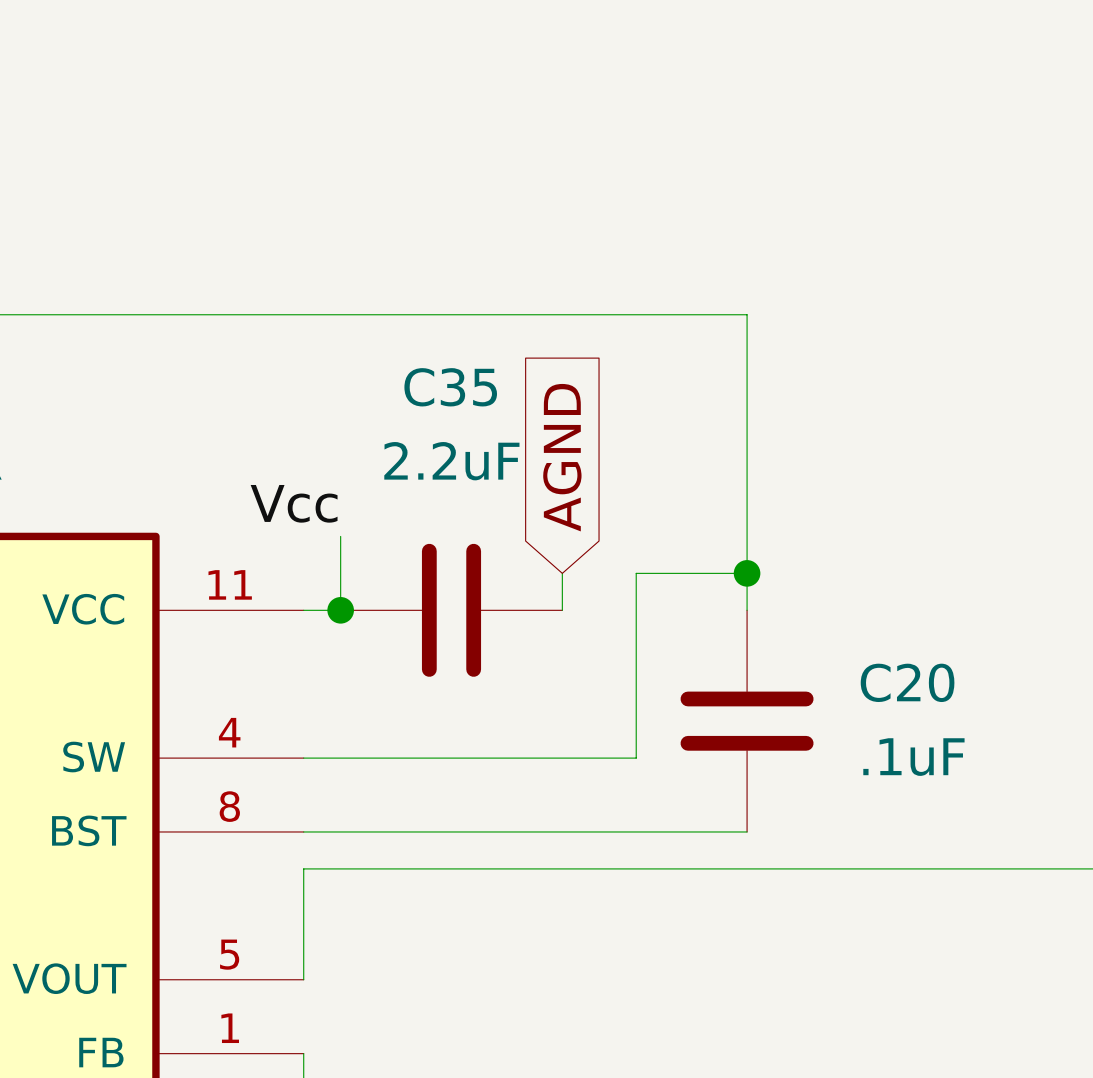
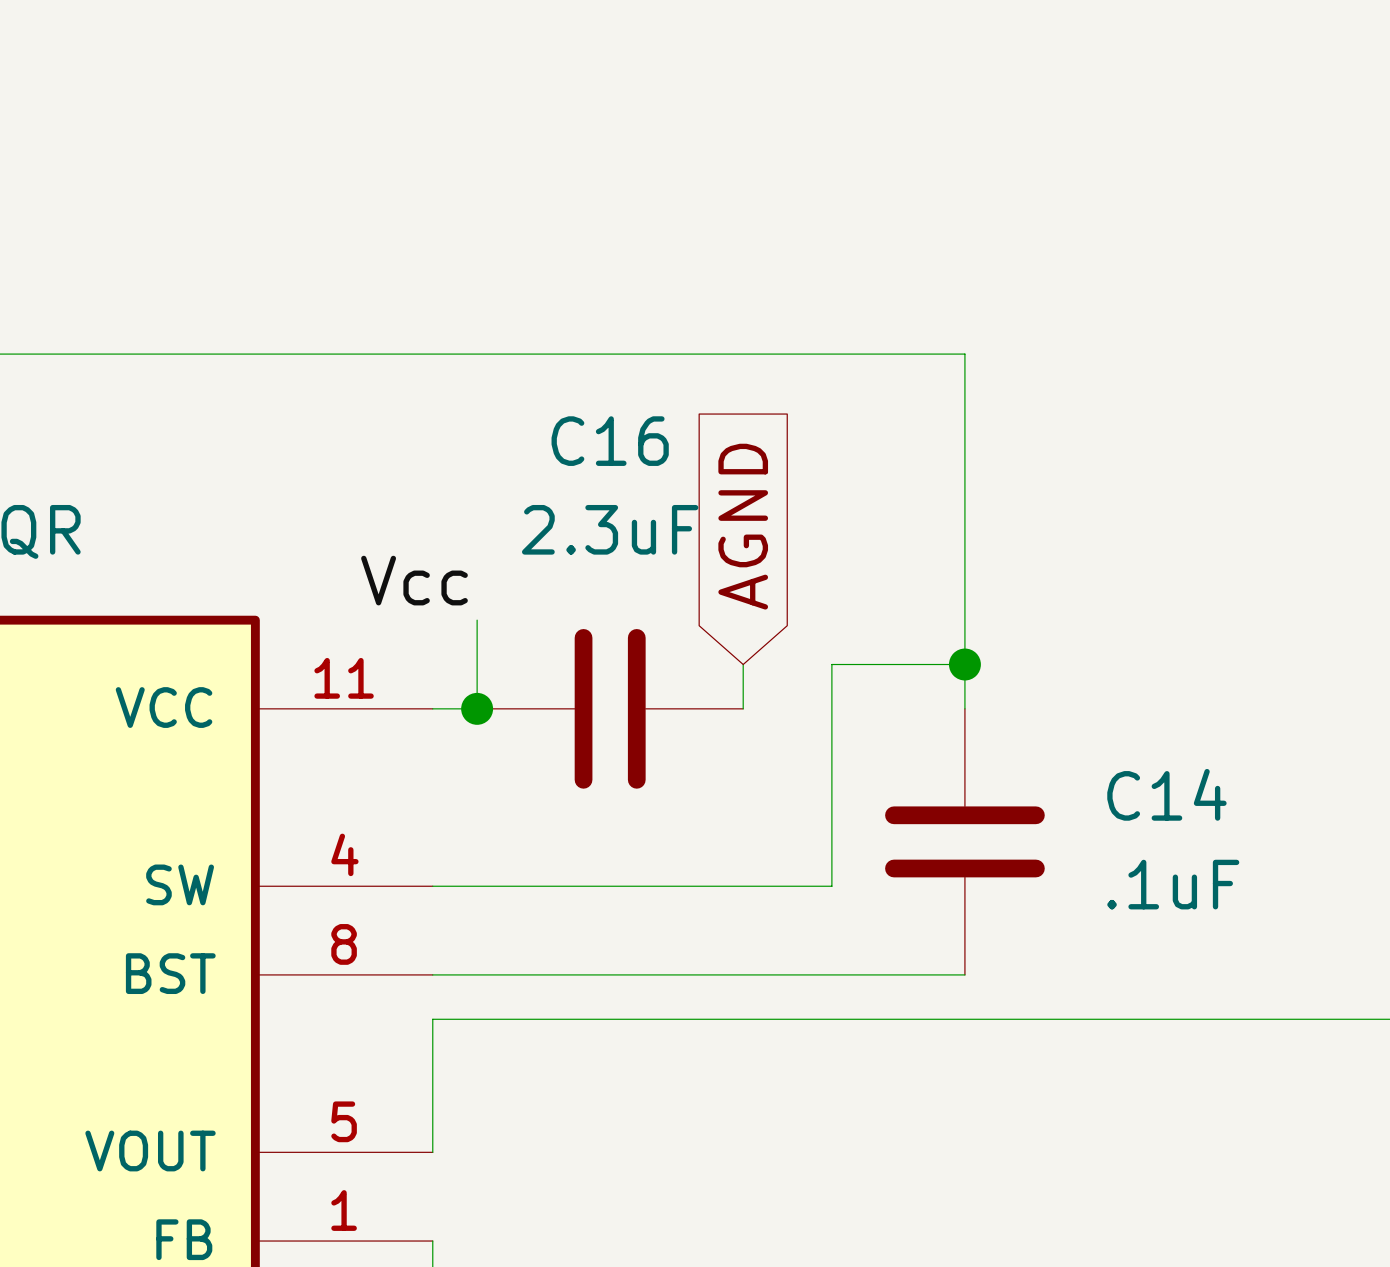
C35 name: C35 (450, 387) -> C16 (610, 441)
C35 value: 2.2uF (451, 461) -> 2.3uF (610, 529)
C20 name: C20 (907, 682) -> C14 (1166, 794)

